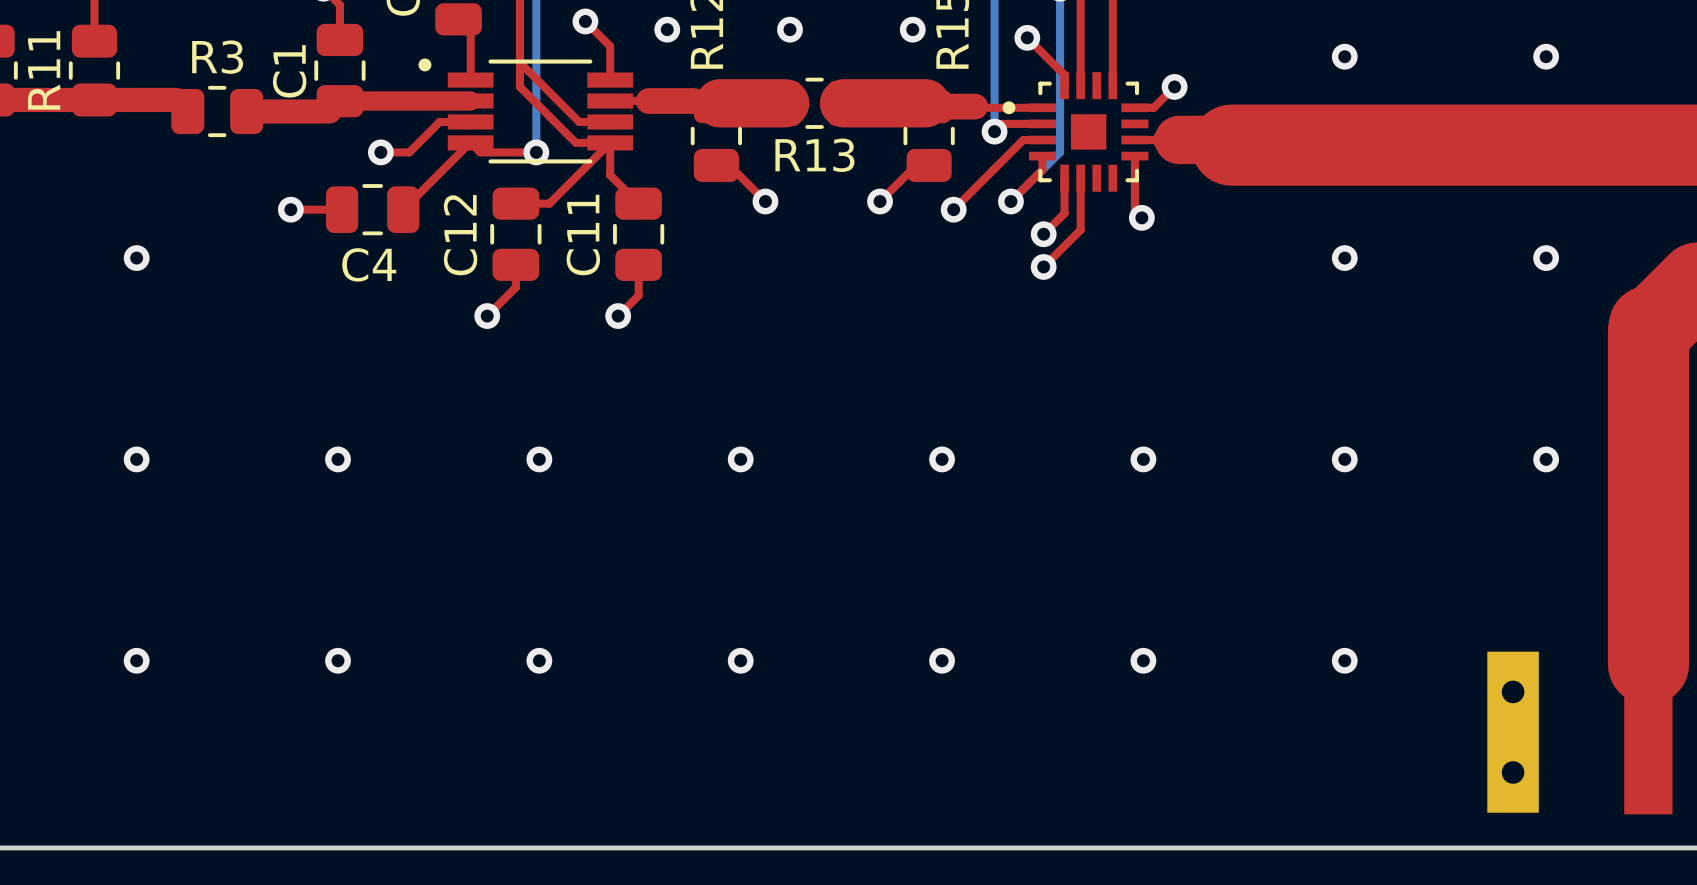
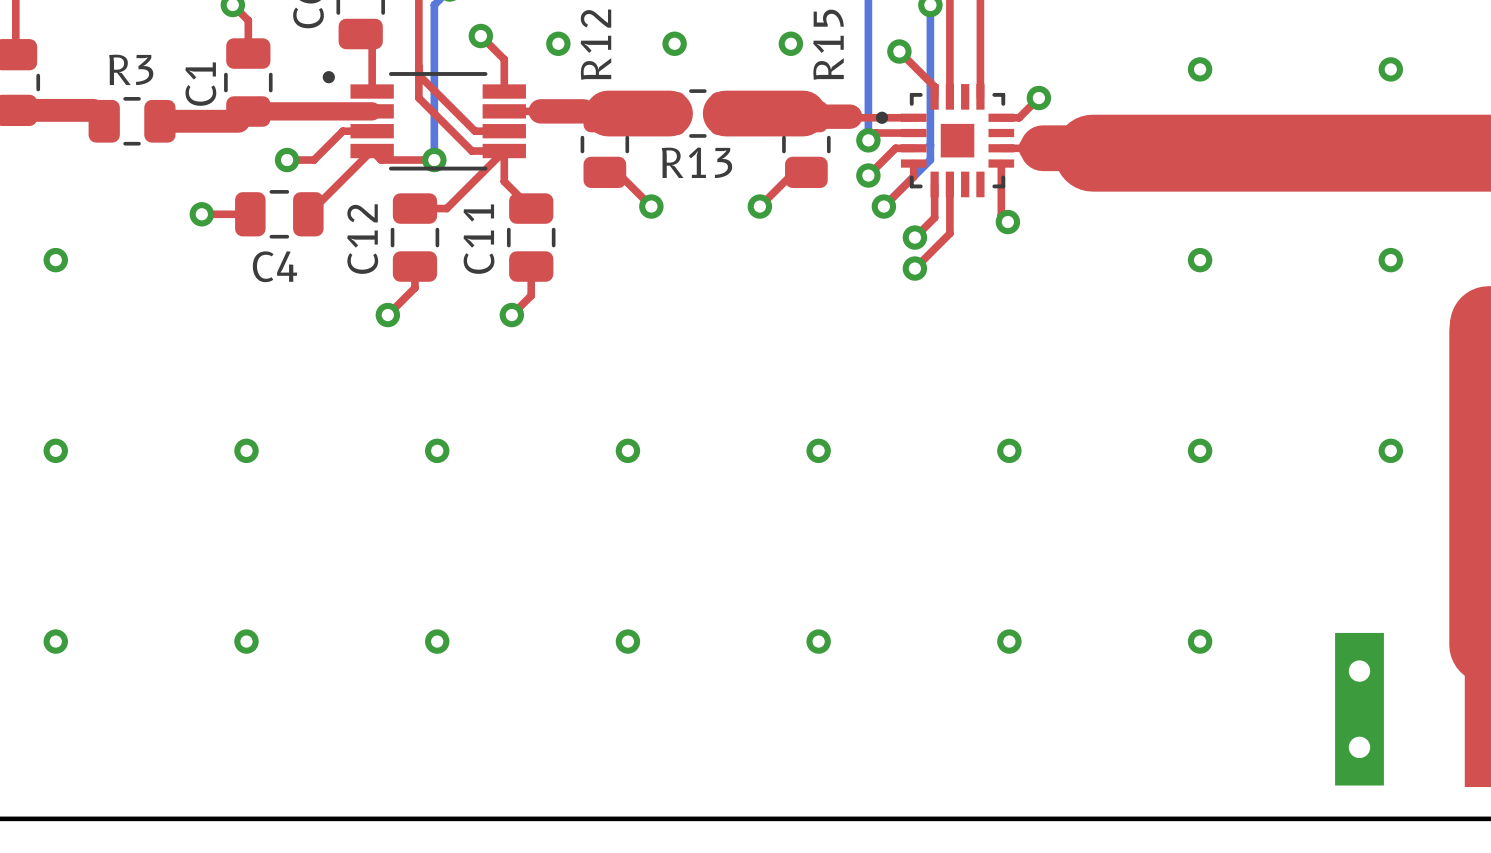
top track: (994, 168) (953, 209) -> none
via position: (953, 209) -> (868, 175)

